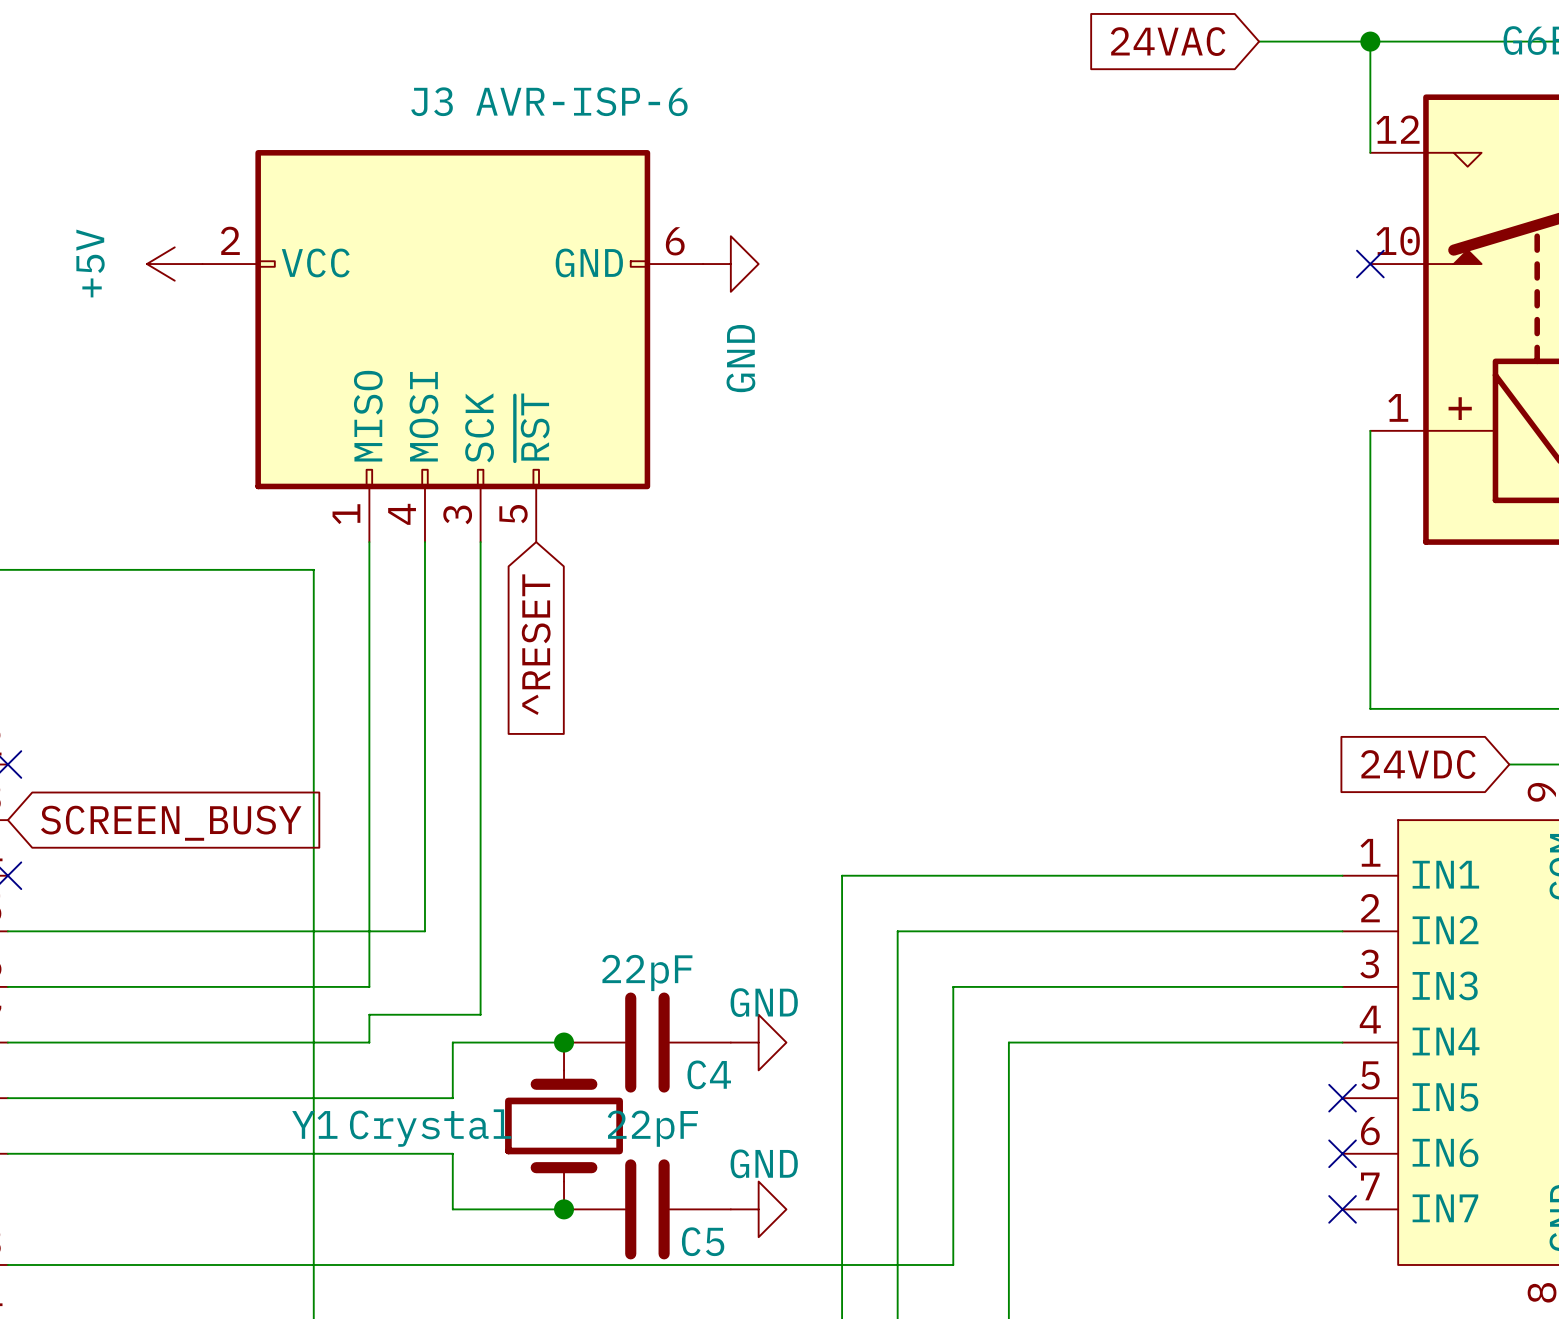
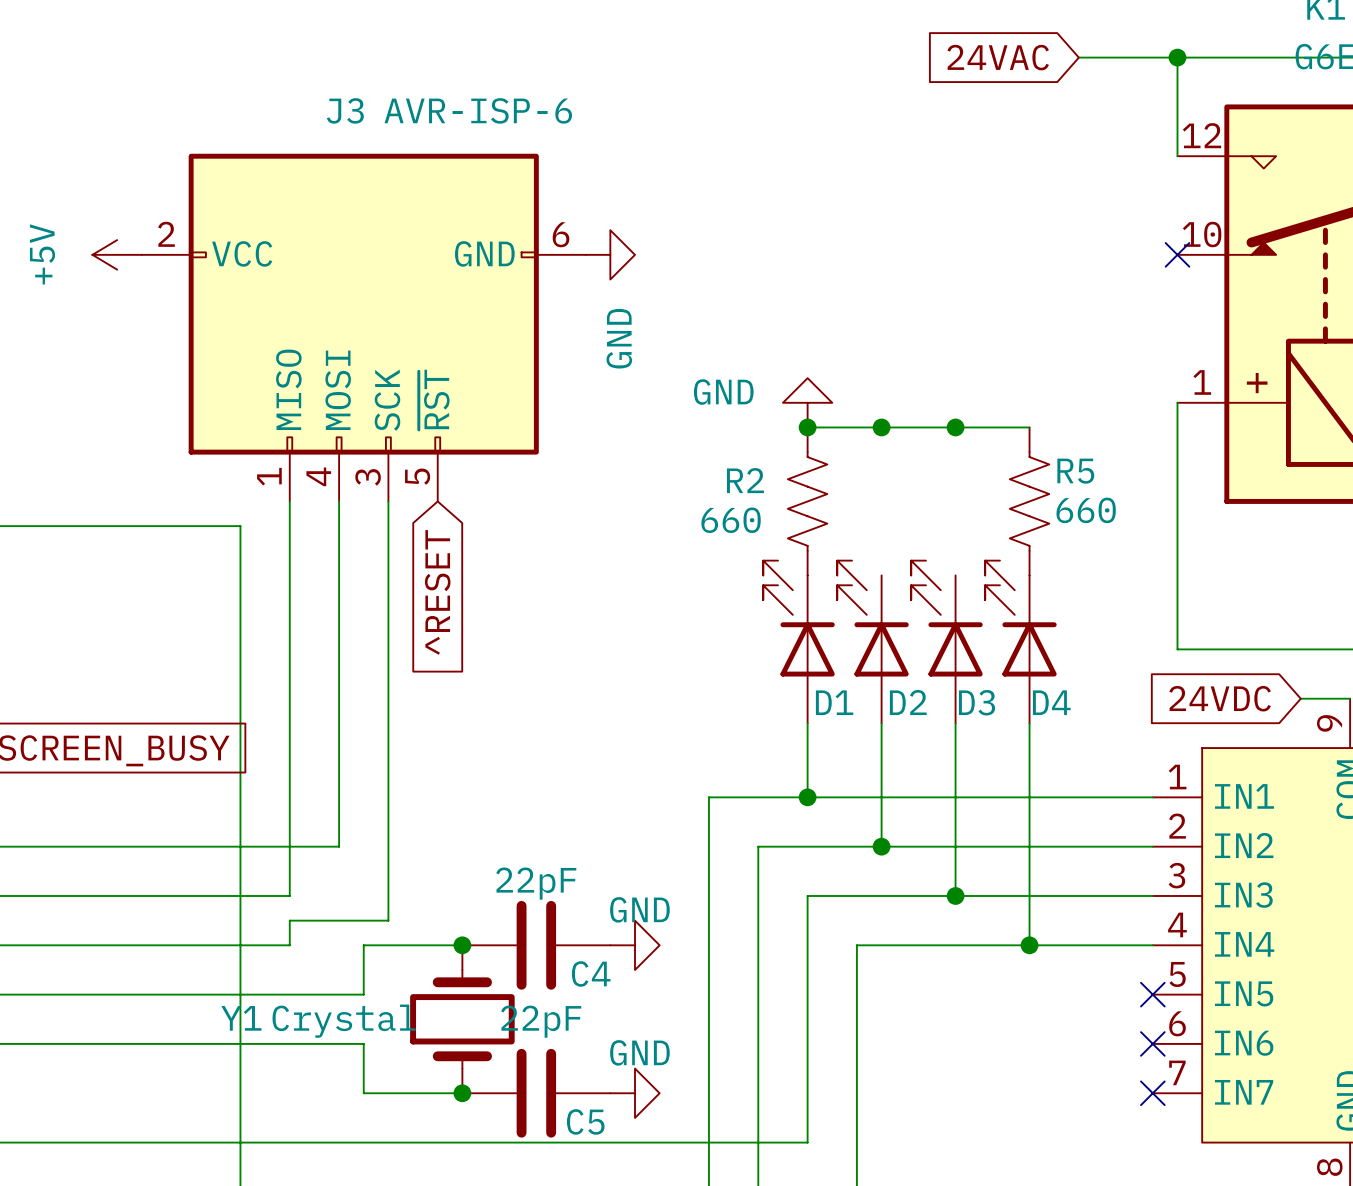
power symbol: none -> GND (807, 402)
wire: none -> (807, 427) (1029, 427)
junction: none -> (807, 427)
junction: none -> (881, 427)
junction: none -> (955, 427)
R2: none -> 660 (807, 501)
R5: none -> 660 (1029, 501)
D1: none -> (798, 642)
D2: none -> (872, 642)
D3: none -> (946, 642)
D4: none -> (1020, 642)
wire: none -> (807, 723) (807, 797)
wire: none -> (881, 723) (881, 846)
wire: none -> (955, 723) (955, 895)
wire: none -> (1029, 723) (1029, 945)
junction: none -> (807, 797)
junction: none -> (881, 846)
junction: none -> (955, 895)
junction: none -> (1029, 945)

